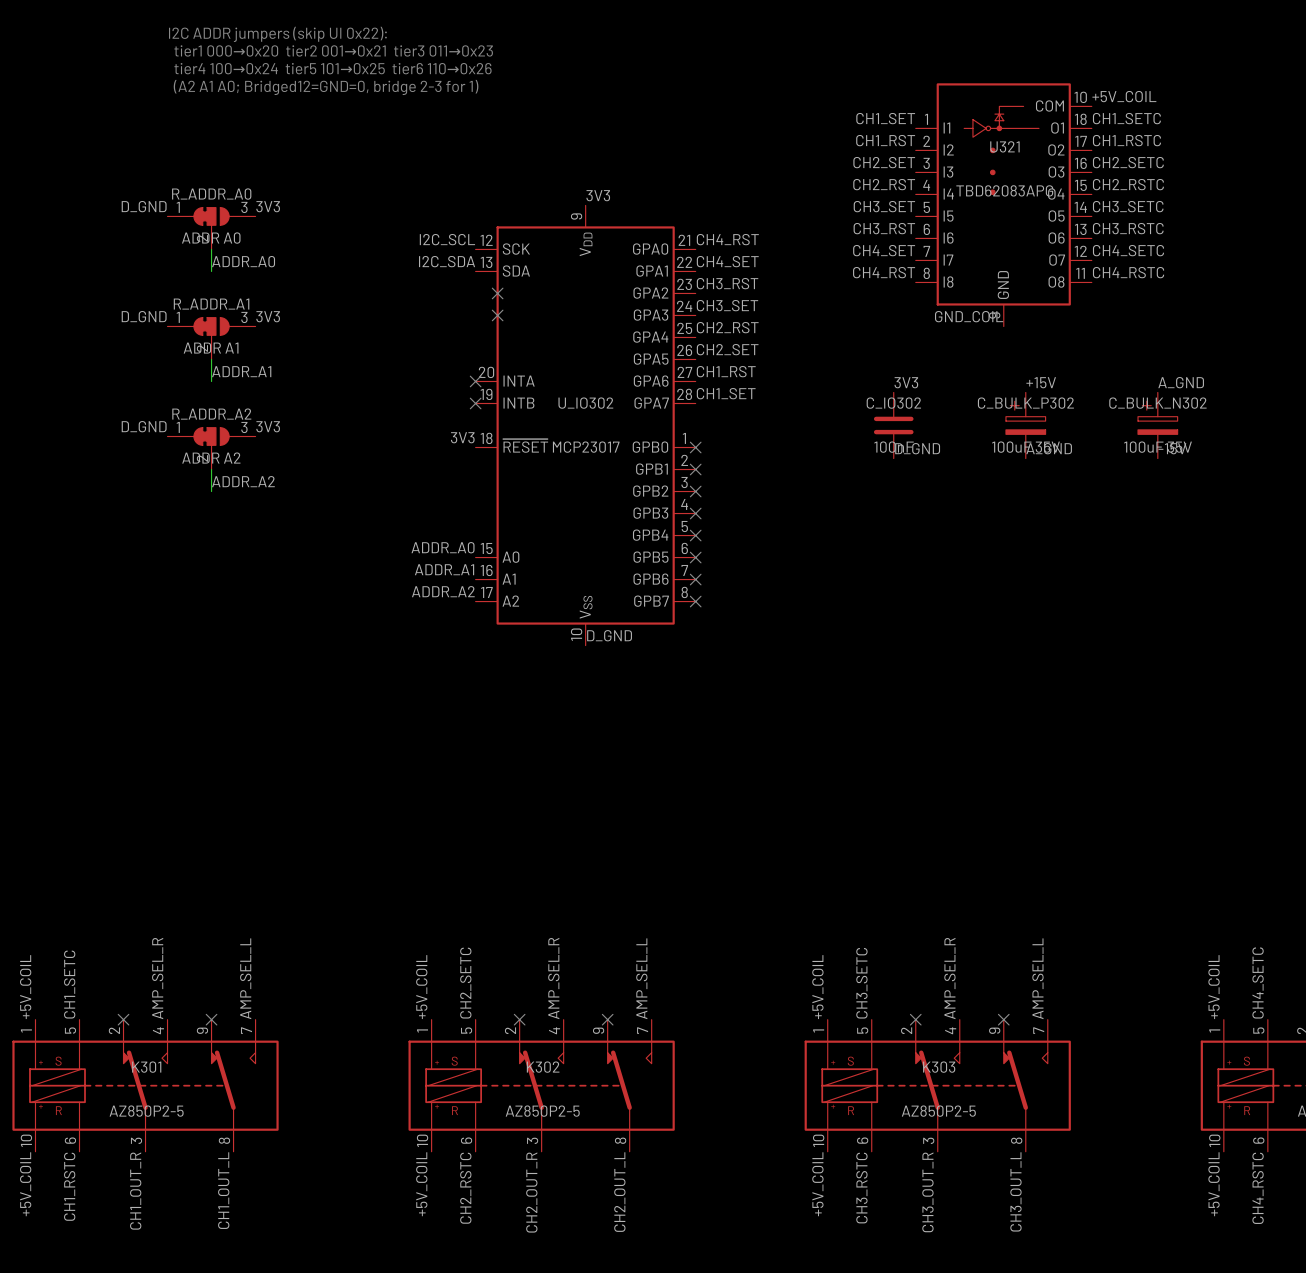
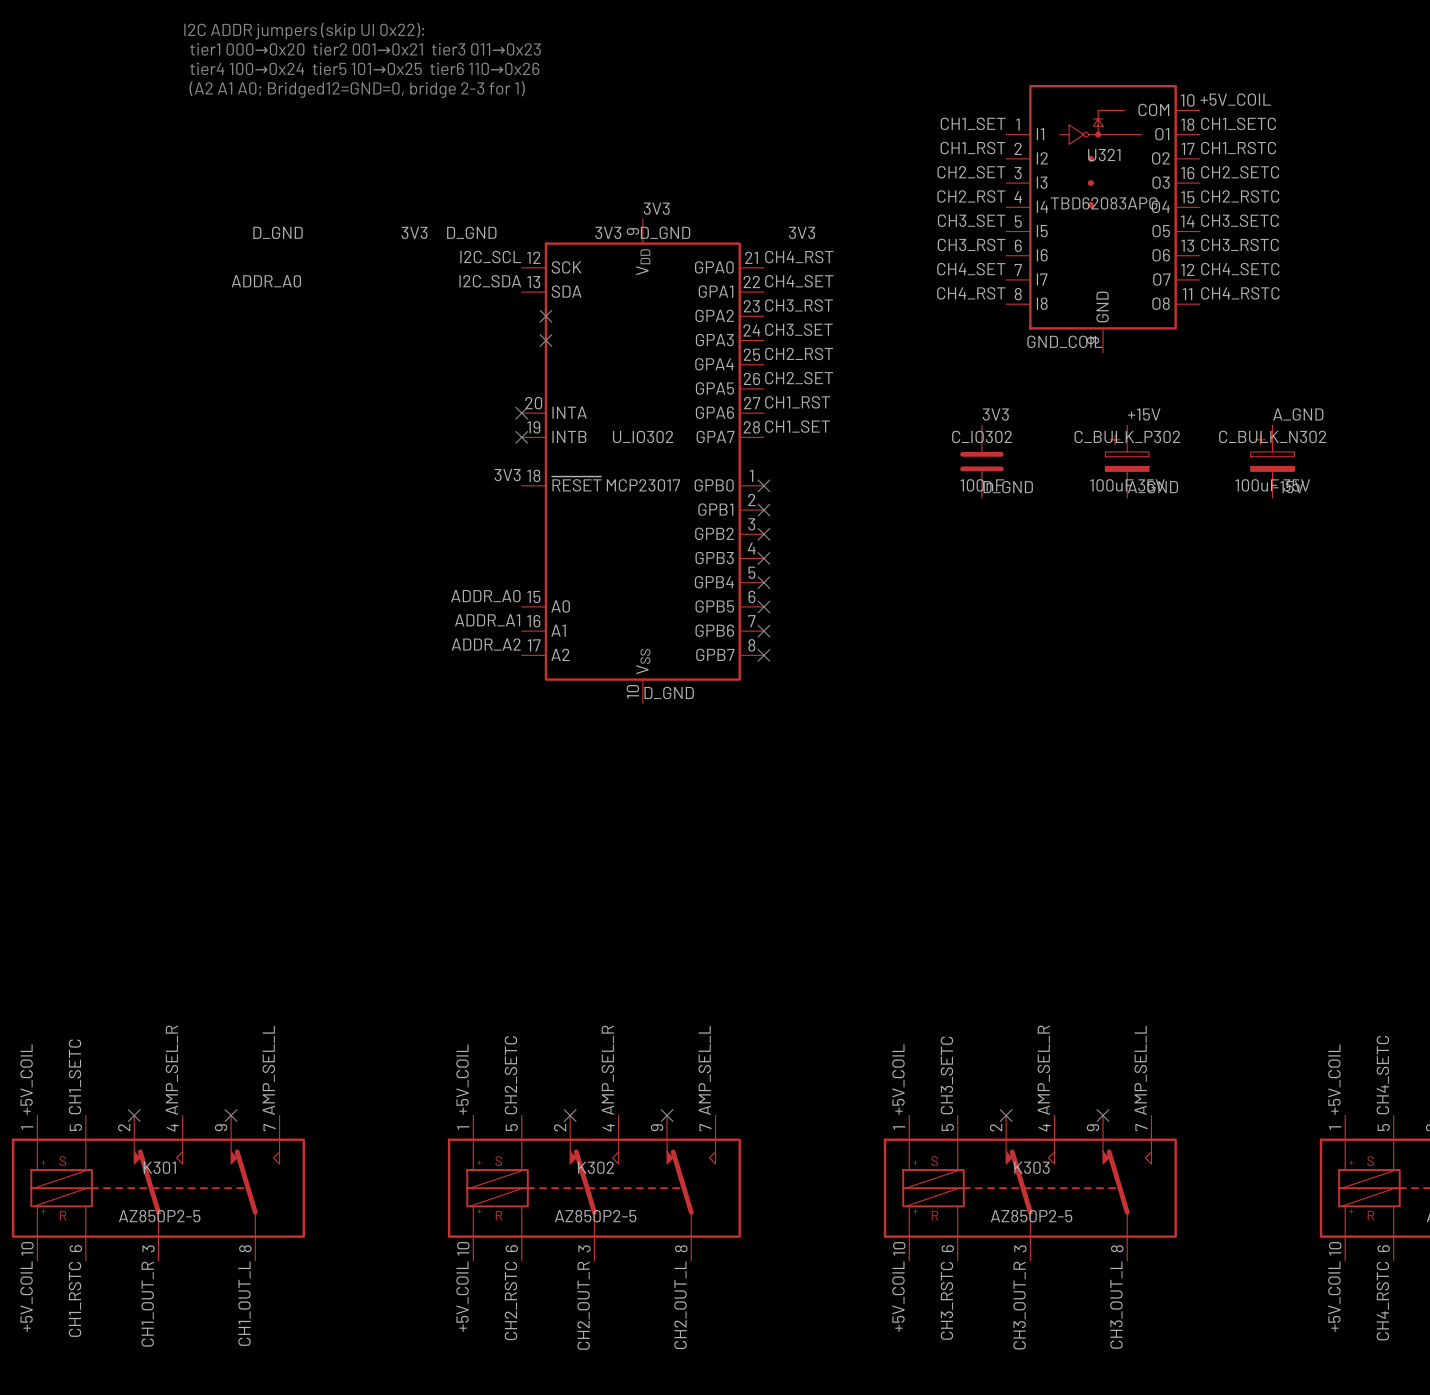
label: D_GND (144, 206) -> none
label: 3V3 (268, 206) -> none
label: none -> D_GND (278, 232)
label: none -> 3V3 (414, 232)
label: none -> D_GND (471, 232)
label: none -> 3V3 (608, 232)
label: none -> D_GND (665, 232)
label: none -> 3V3 (802, 232)
R_ADDR_A0: ADDR A0 (211, 228) -> none
wire: (211, 249) (211, 271) -> none
label: D_GND (144, 316) -> none
label: 3V3 (268, 316) -> none
R_ADDR_A1: ADDR A1 (211, 338) -> none
wire: (211, 359) (211, 381) -> none
label: ADDR_A1 (241, 371) -> none
label: D_GND (144, 426) -> none
label: 3V3 (268, 426) -> none
R_ADDR_A2: ADDR A2 (211, 448) -> none
wire: (211, 469) (211, 491) -> none
label: ADDR_A2 (243, 481) -> none

